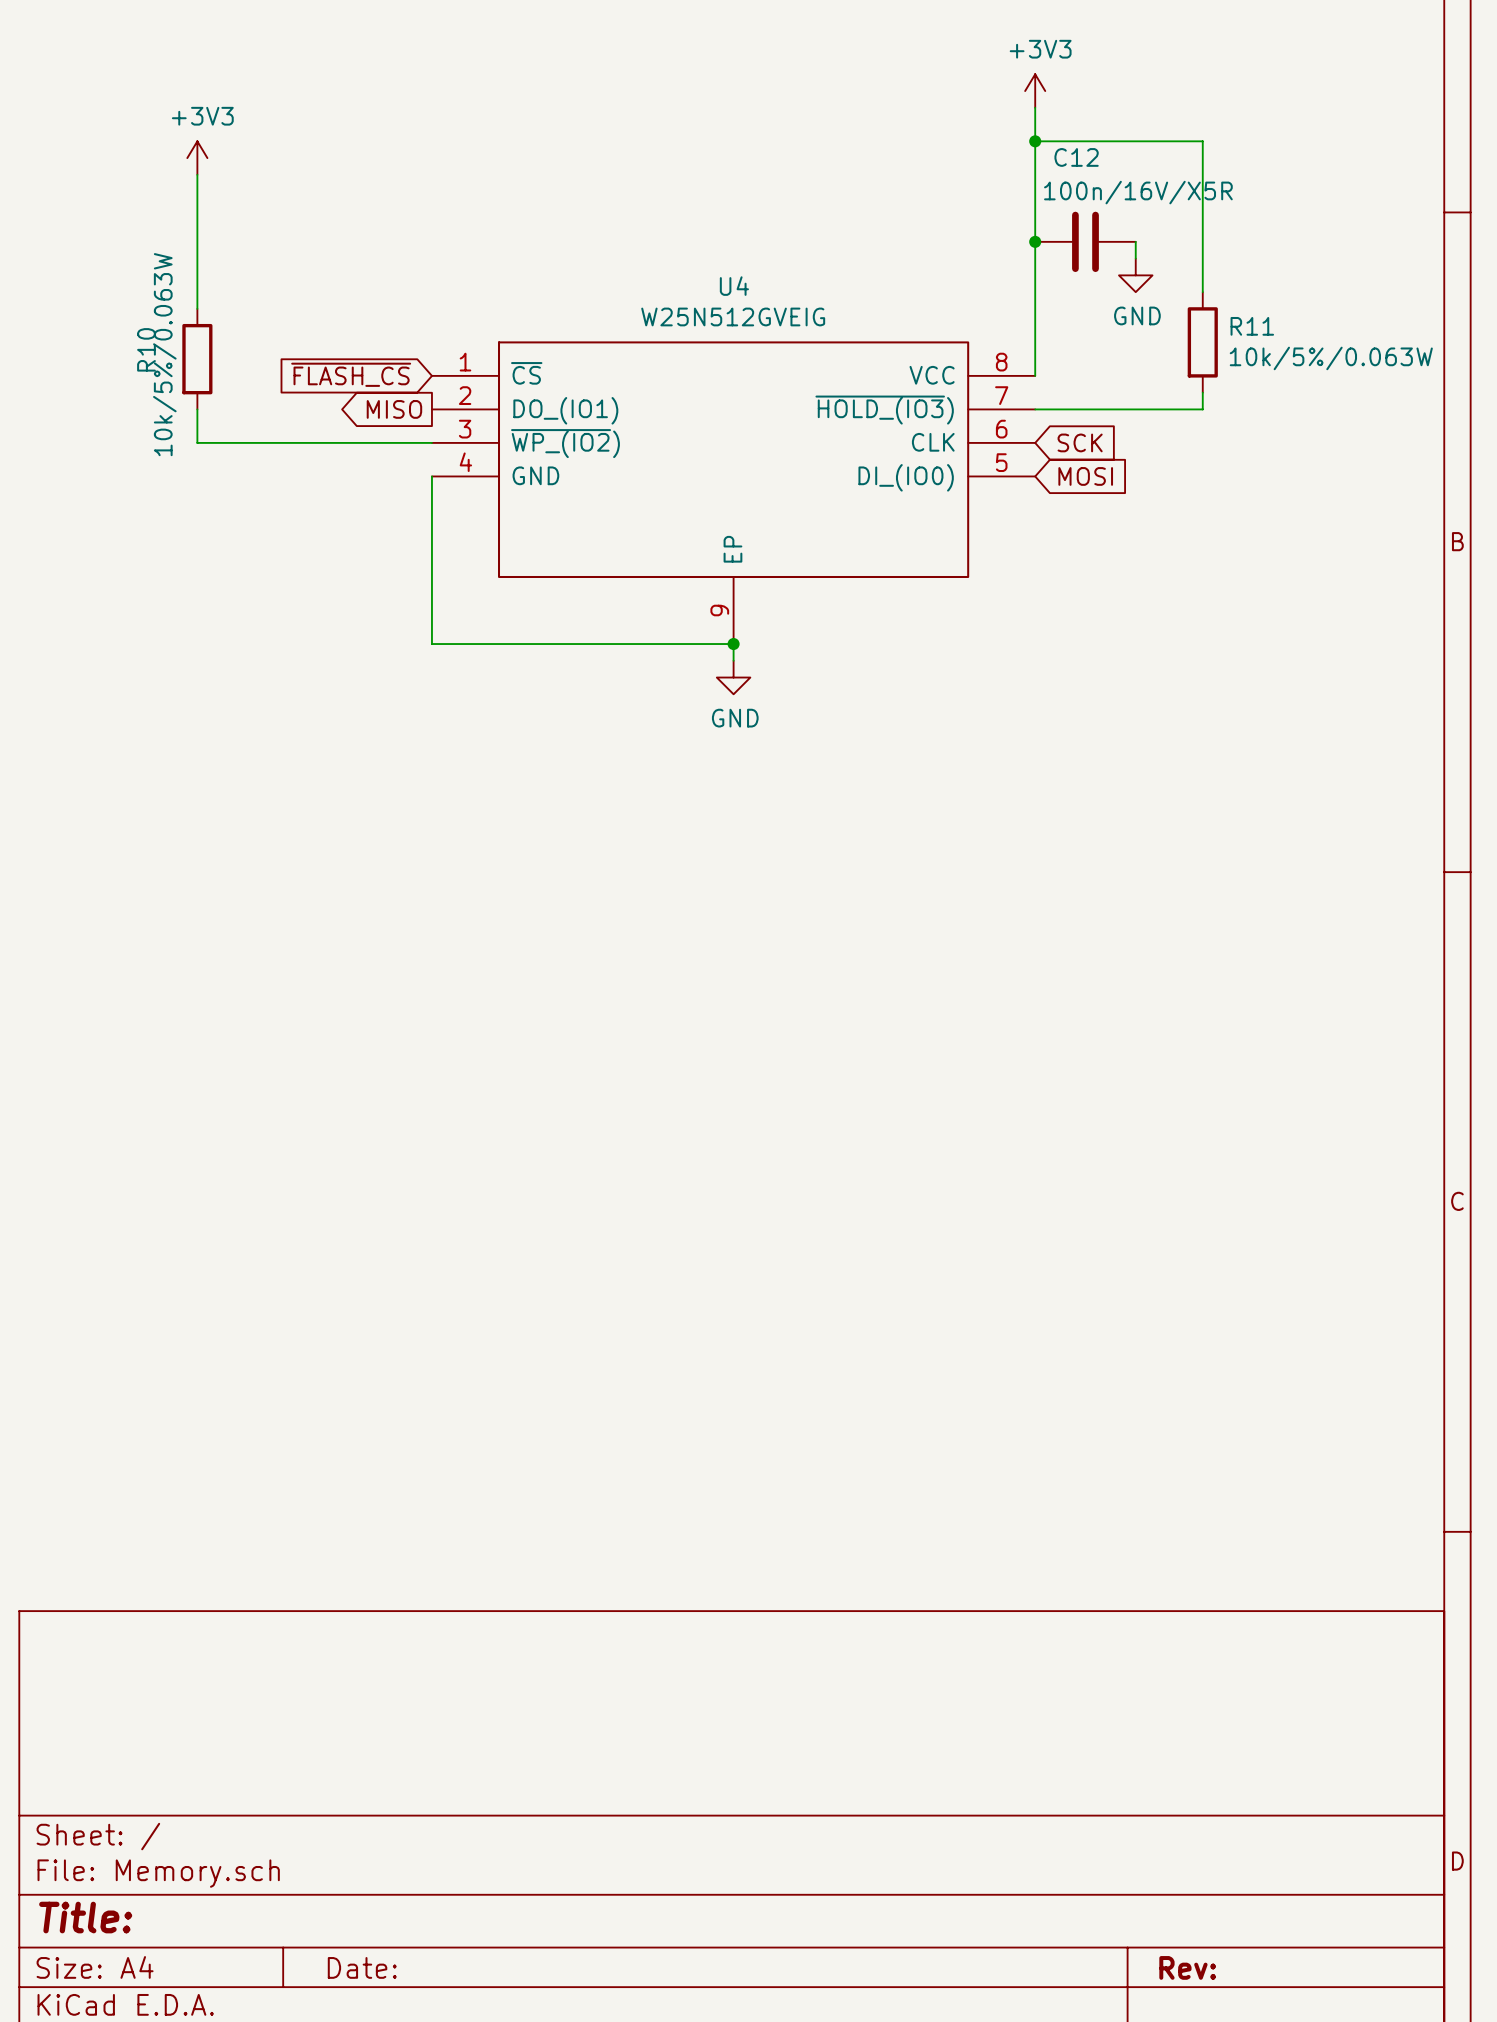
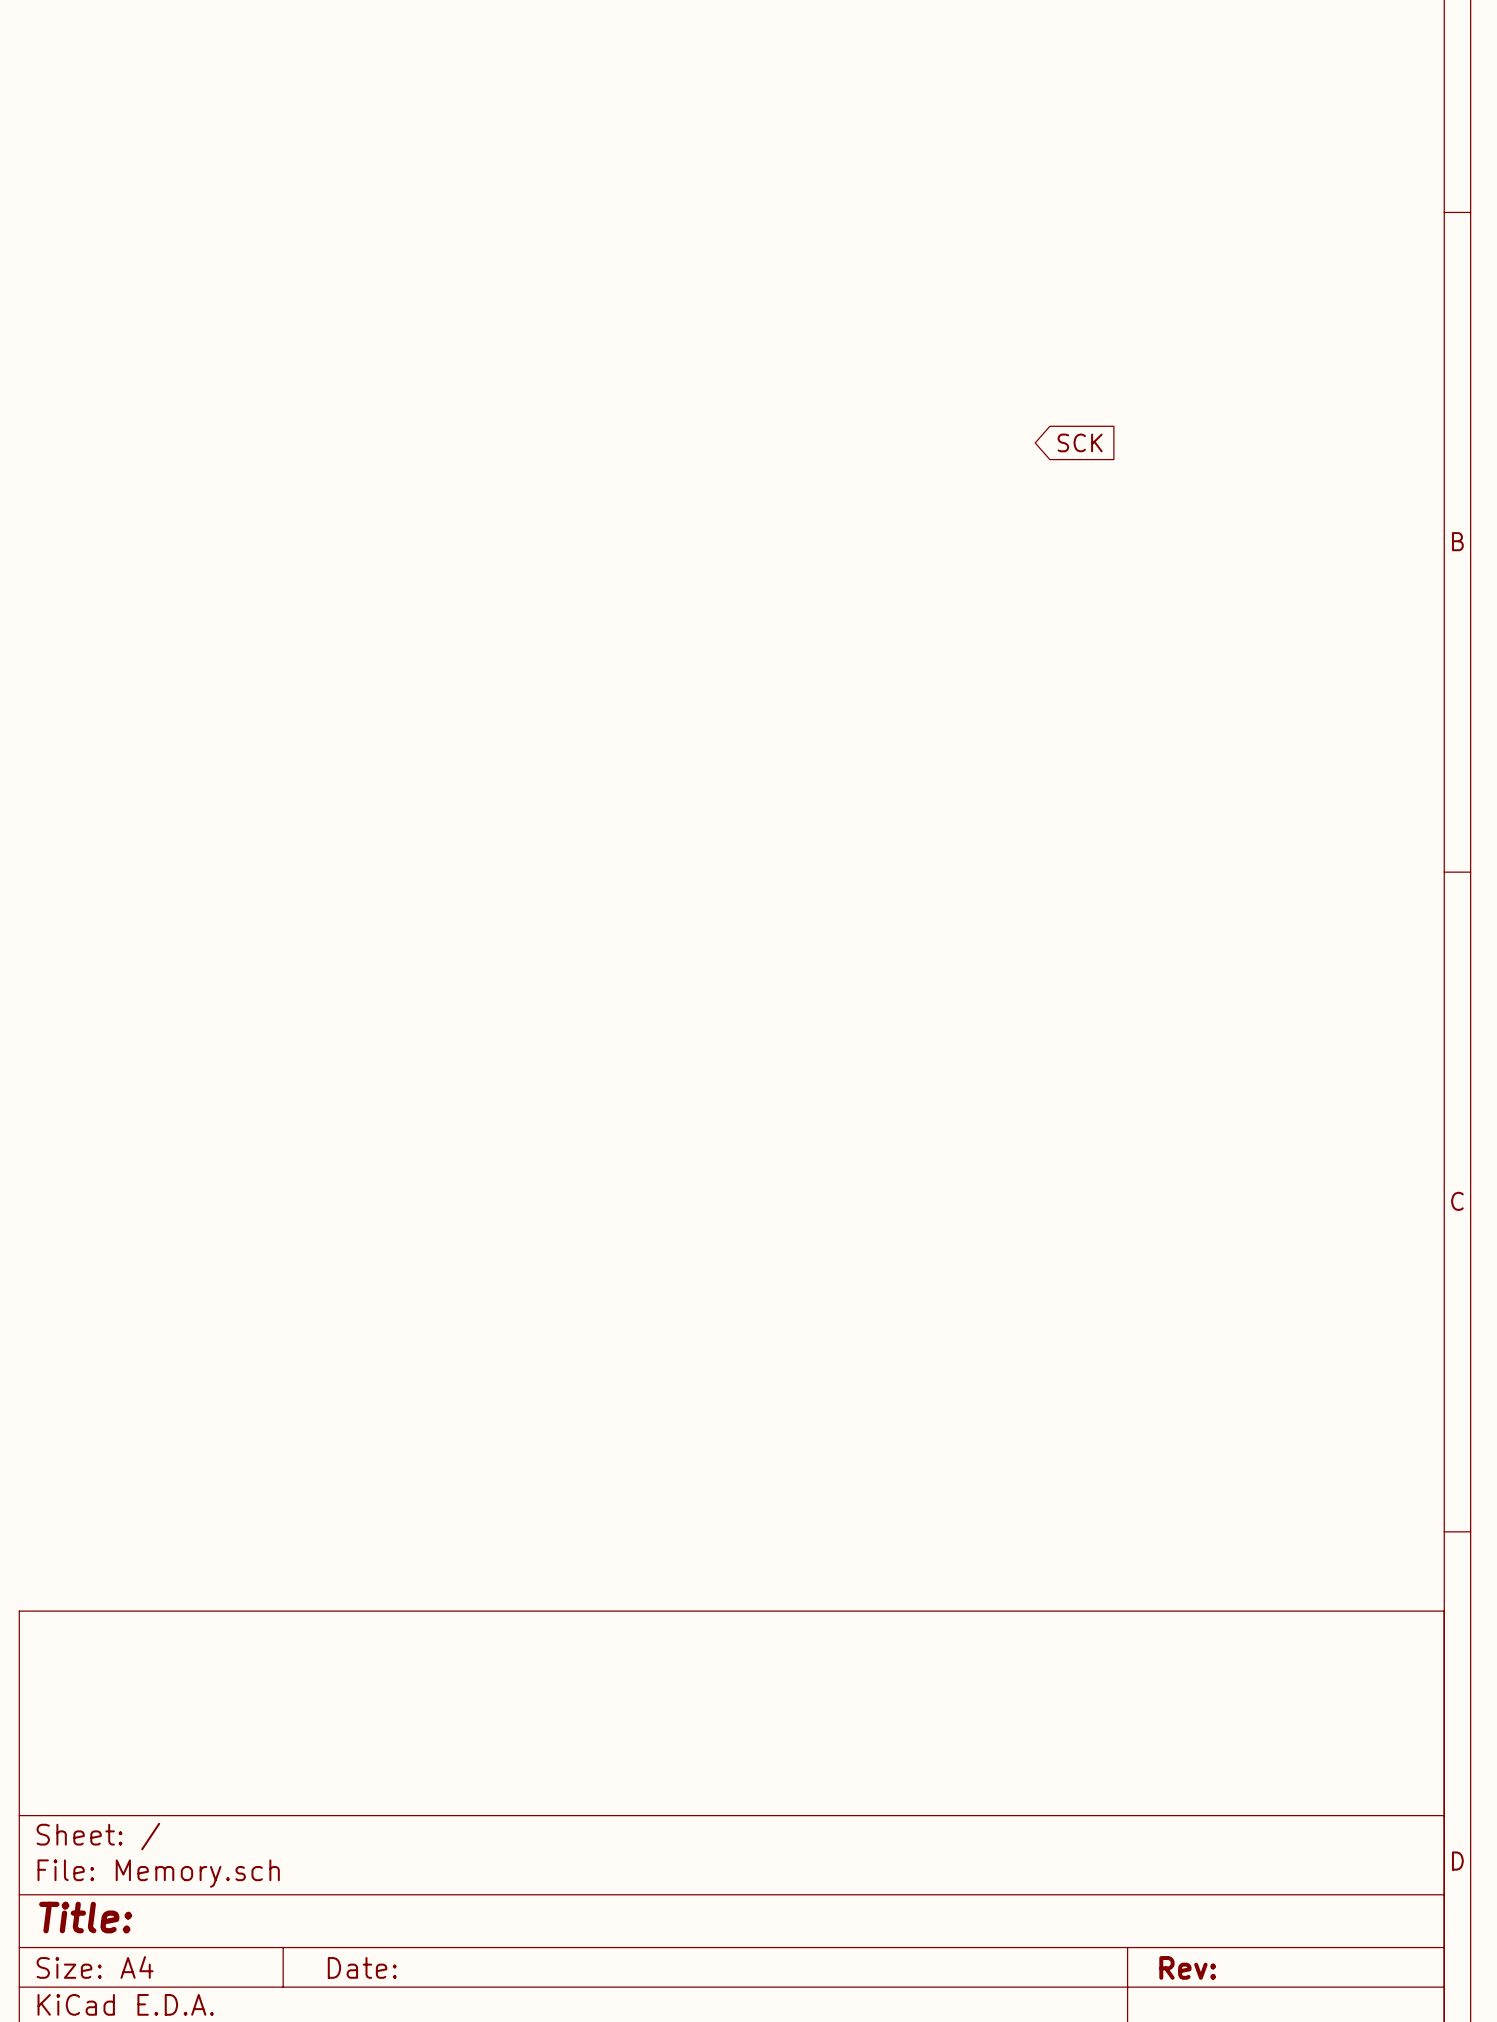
power symbol: +3V3 (1035, 91) -> none
wire: (1035, 107) (1035, 375) -> none
wire: (1035, 141) (1202, 141) (1202, 292) -> none
junction: (1035, 141) -> none
power symbol: +3V3 (197, 158) -> none
wire: (197, 174) (197, 308) -> none
junction: (1035, 241) -> none
C12: 100n/16V/X5R (1085, 241) -> none
wire: (1135, 241) (1135, 258) -> none
power symbol: GND (1135, 275) -> none
R11: 10k/5%/0.063W (1202, 342) -> none
R10: 10k/5%/0.063W (197, 359) -> none
global label: ~{FLASH_CS} (351, 374) -> none
wire: (1202, 392) (1202, 409) (1035, 409) -> none
wire: (197, 409) (197, 442) (431, 442) -> none
global label: MISO (394, 409) -> none
wire: (431, 476) (431, 644) (733, 644) (733, 660) -> none
global label: MOSI (1085, 476) -> none
U4: W25N512GVEIG (733, 492) -> none
junction: (733, 644) -> none
power symbol: GND (733, 677) -> none

